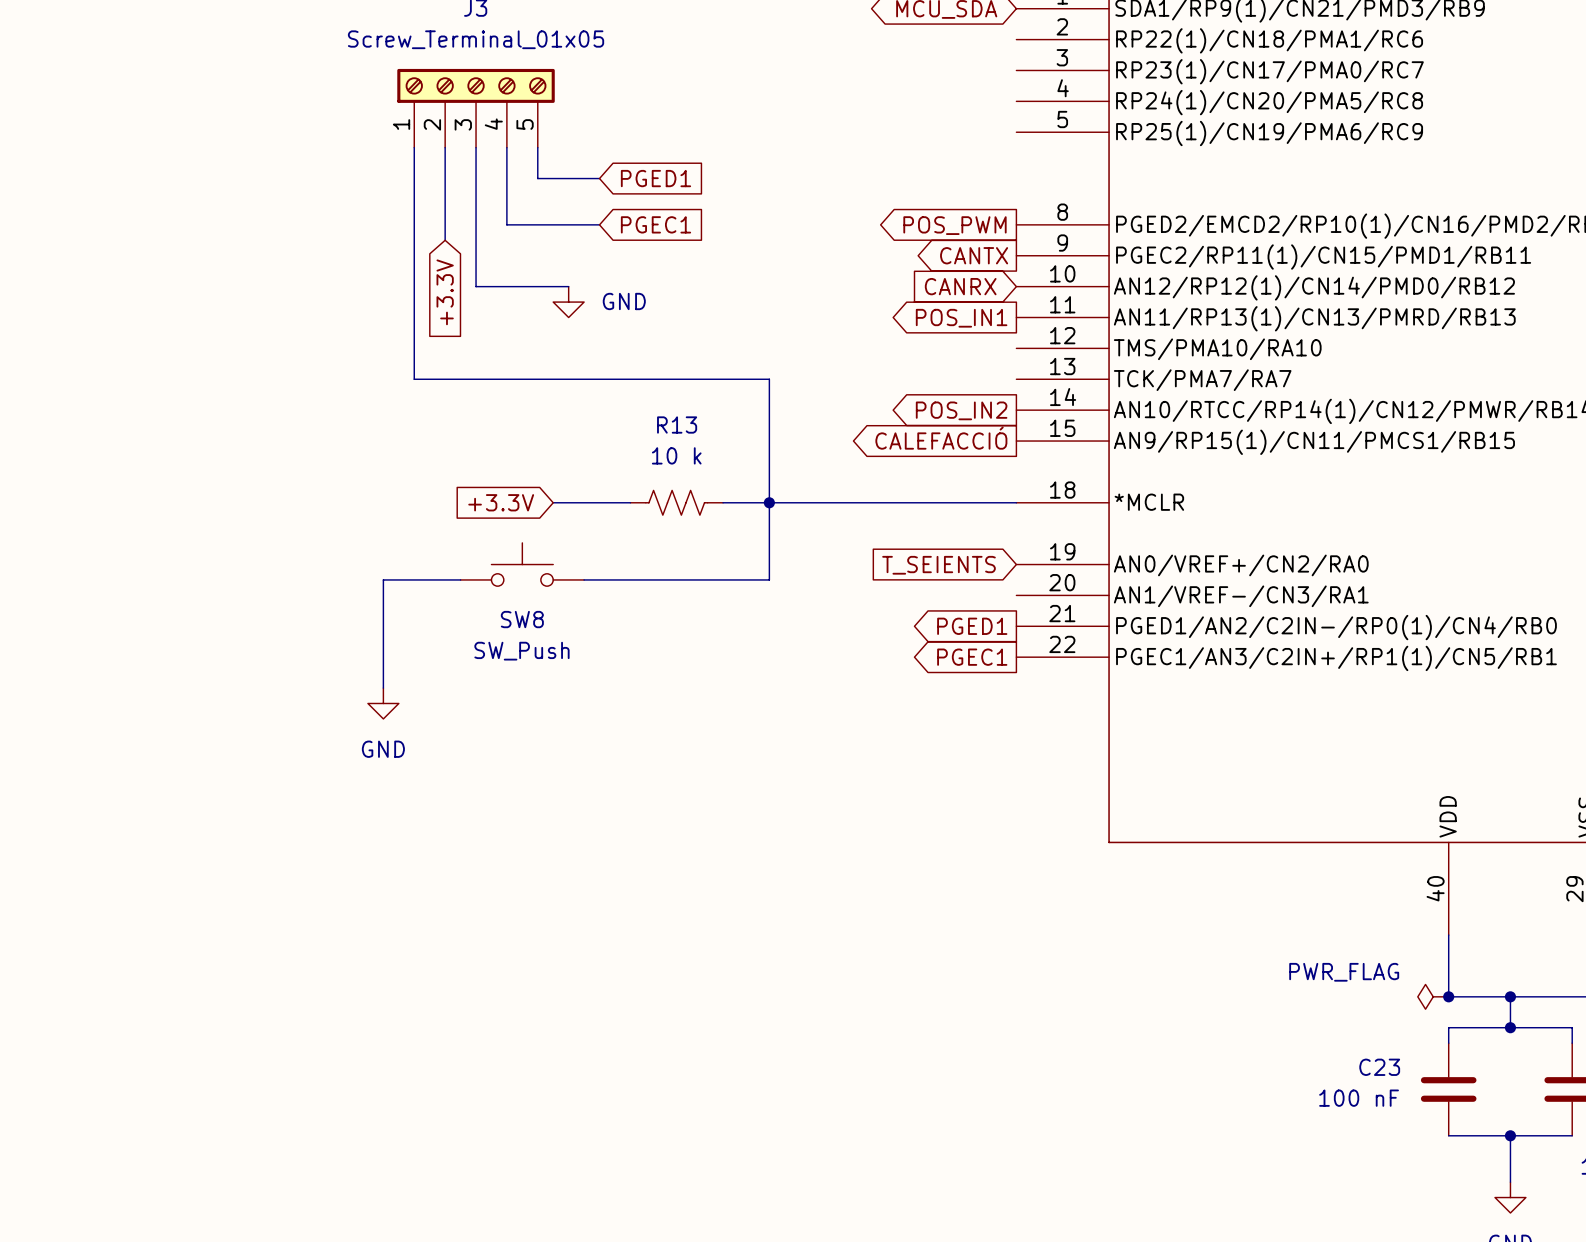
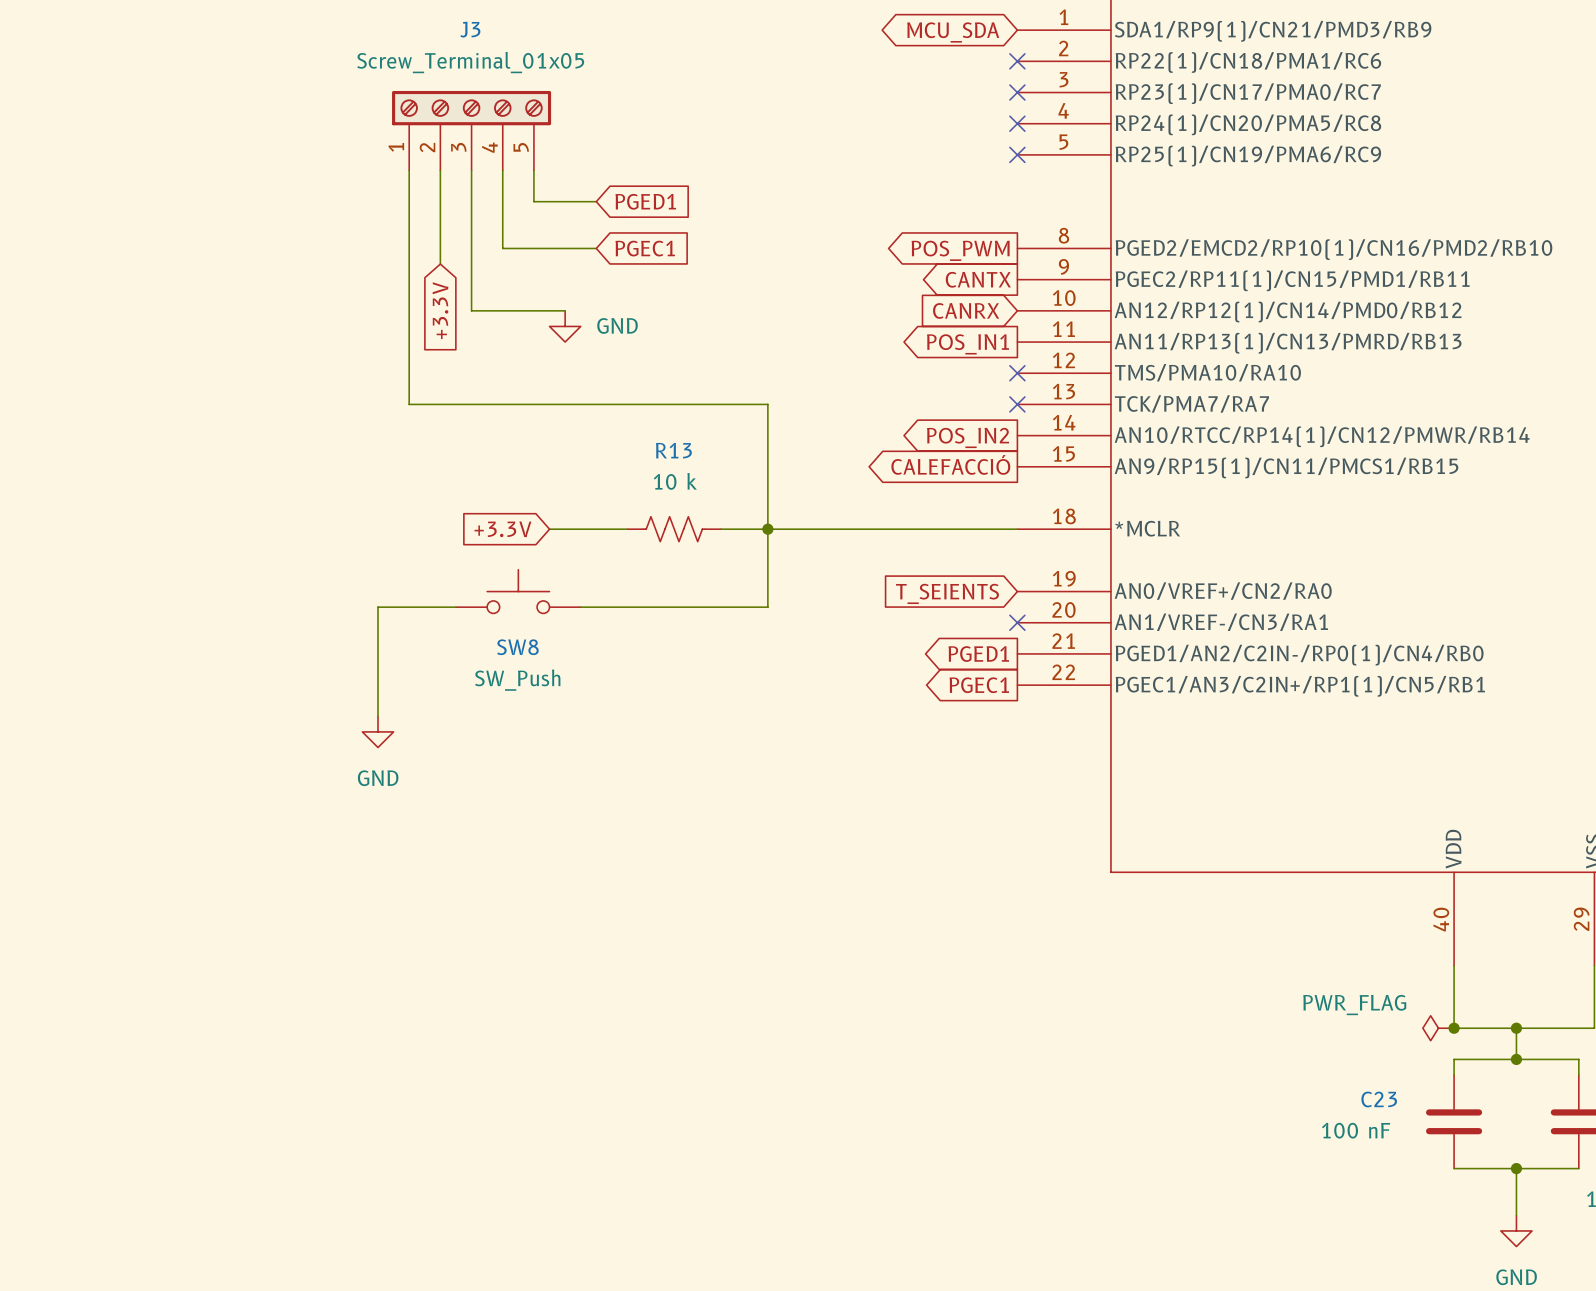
no-connect mark: none -> (1017, 61)
no-connect mark: none -> (1017, 92)
no-connect mark: none -> (1017, 123)
no-connect mark: none -> (1017, 154)
no-connect mark: none -> (1017, 373)
no-connect mark: none -> (1017, 404)
no-connect mark: none -> (1017, 622)

